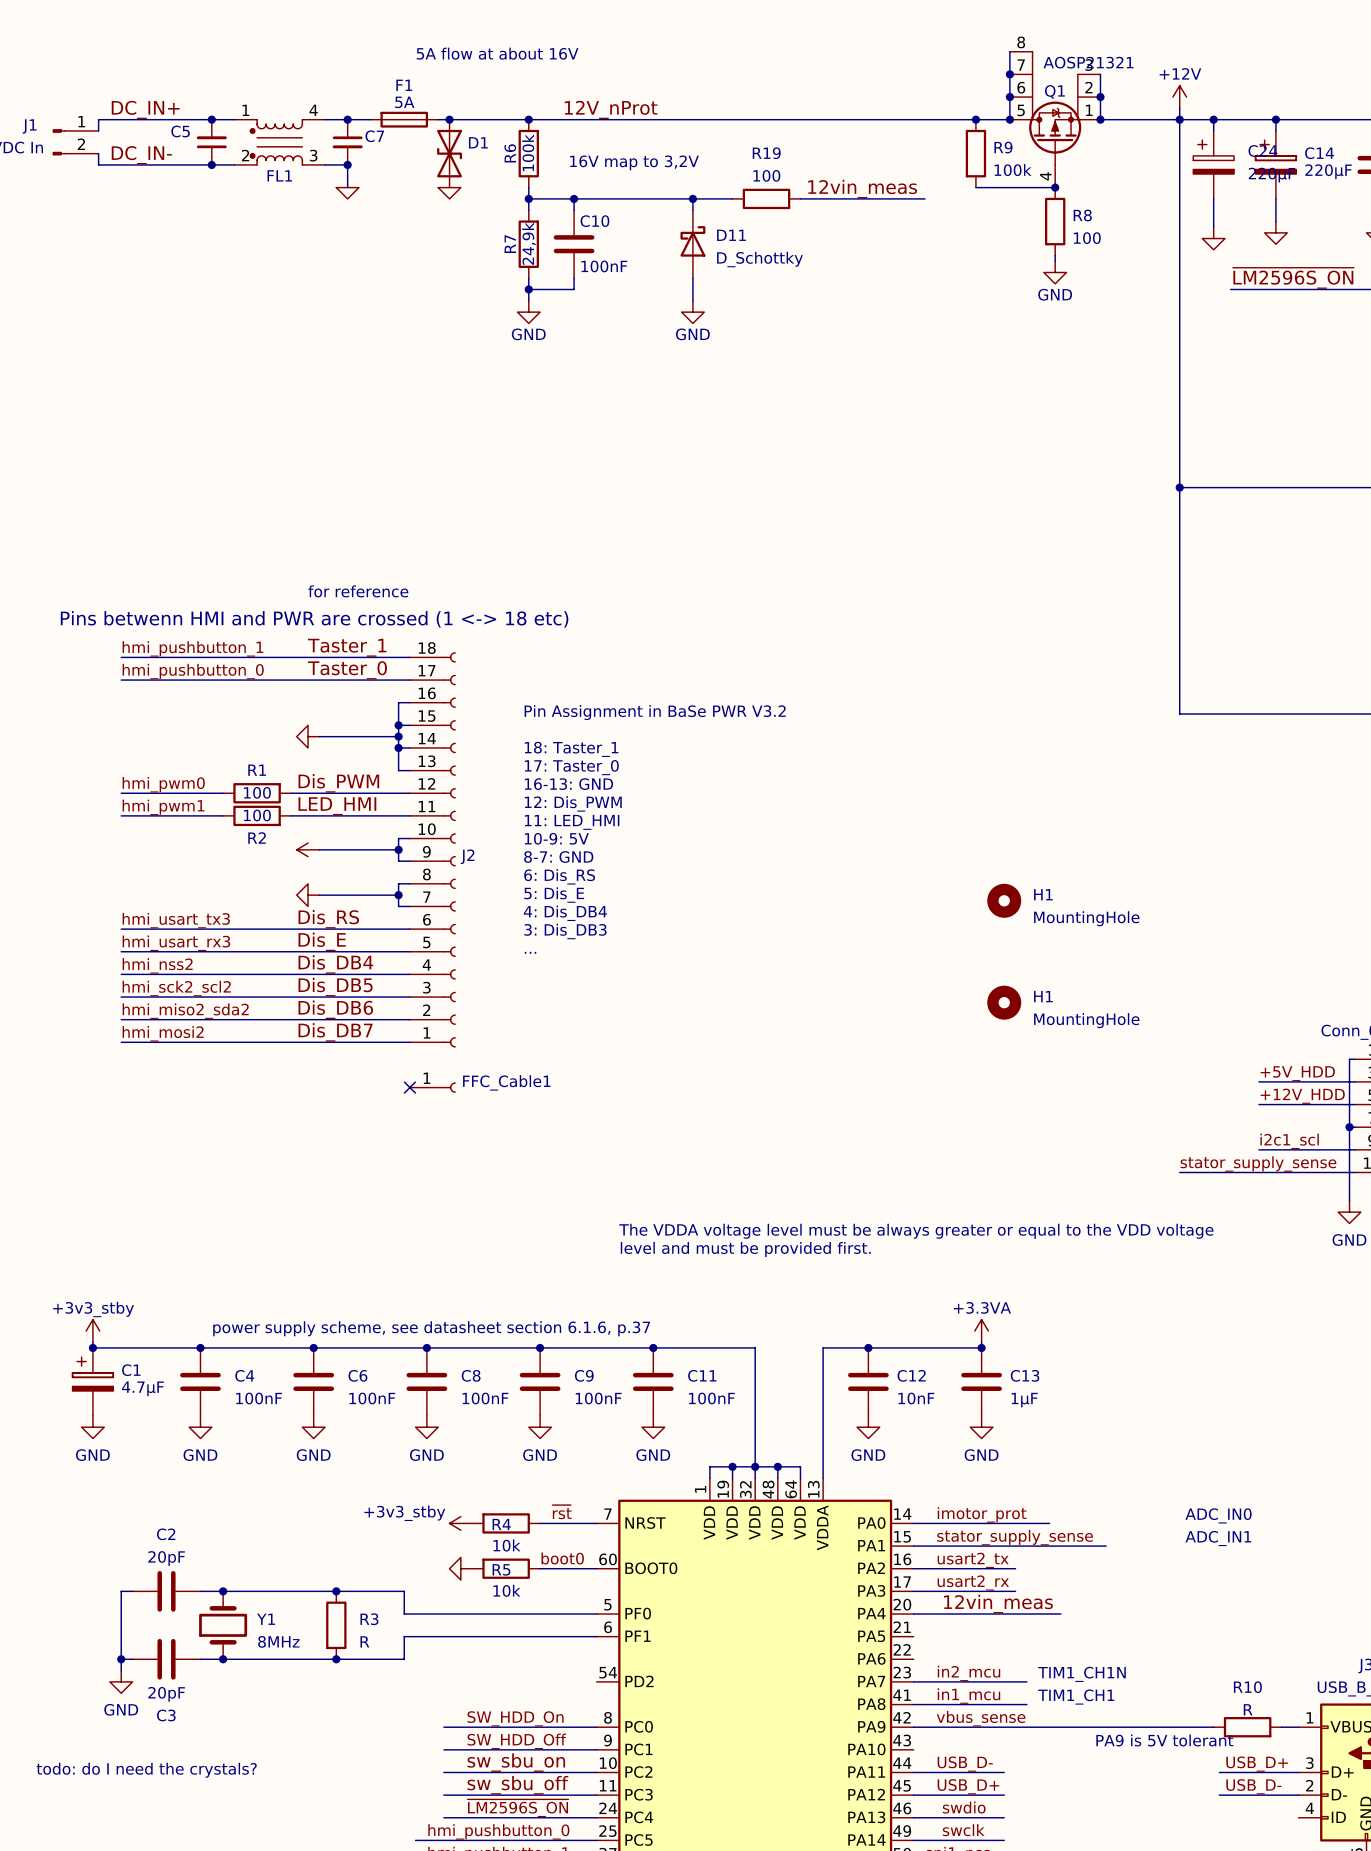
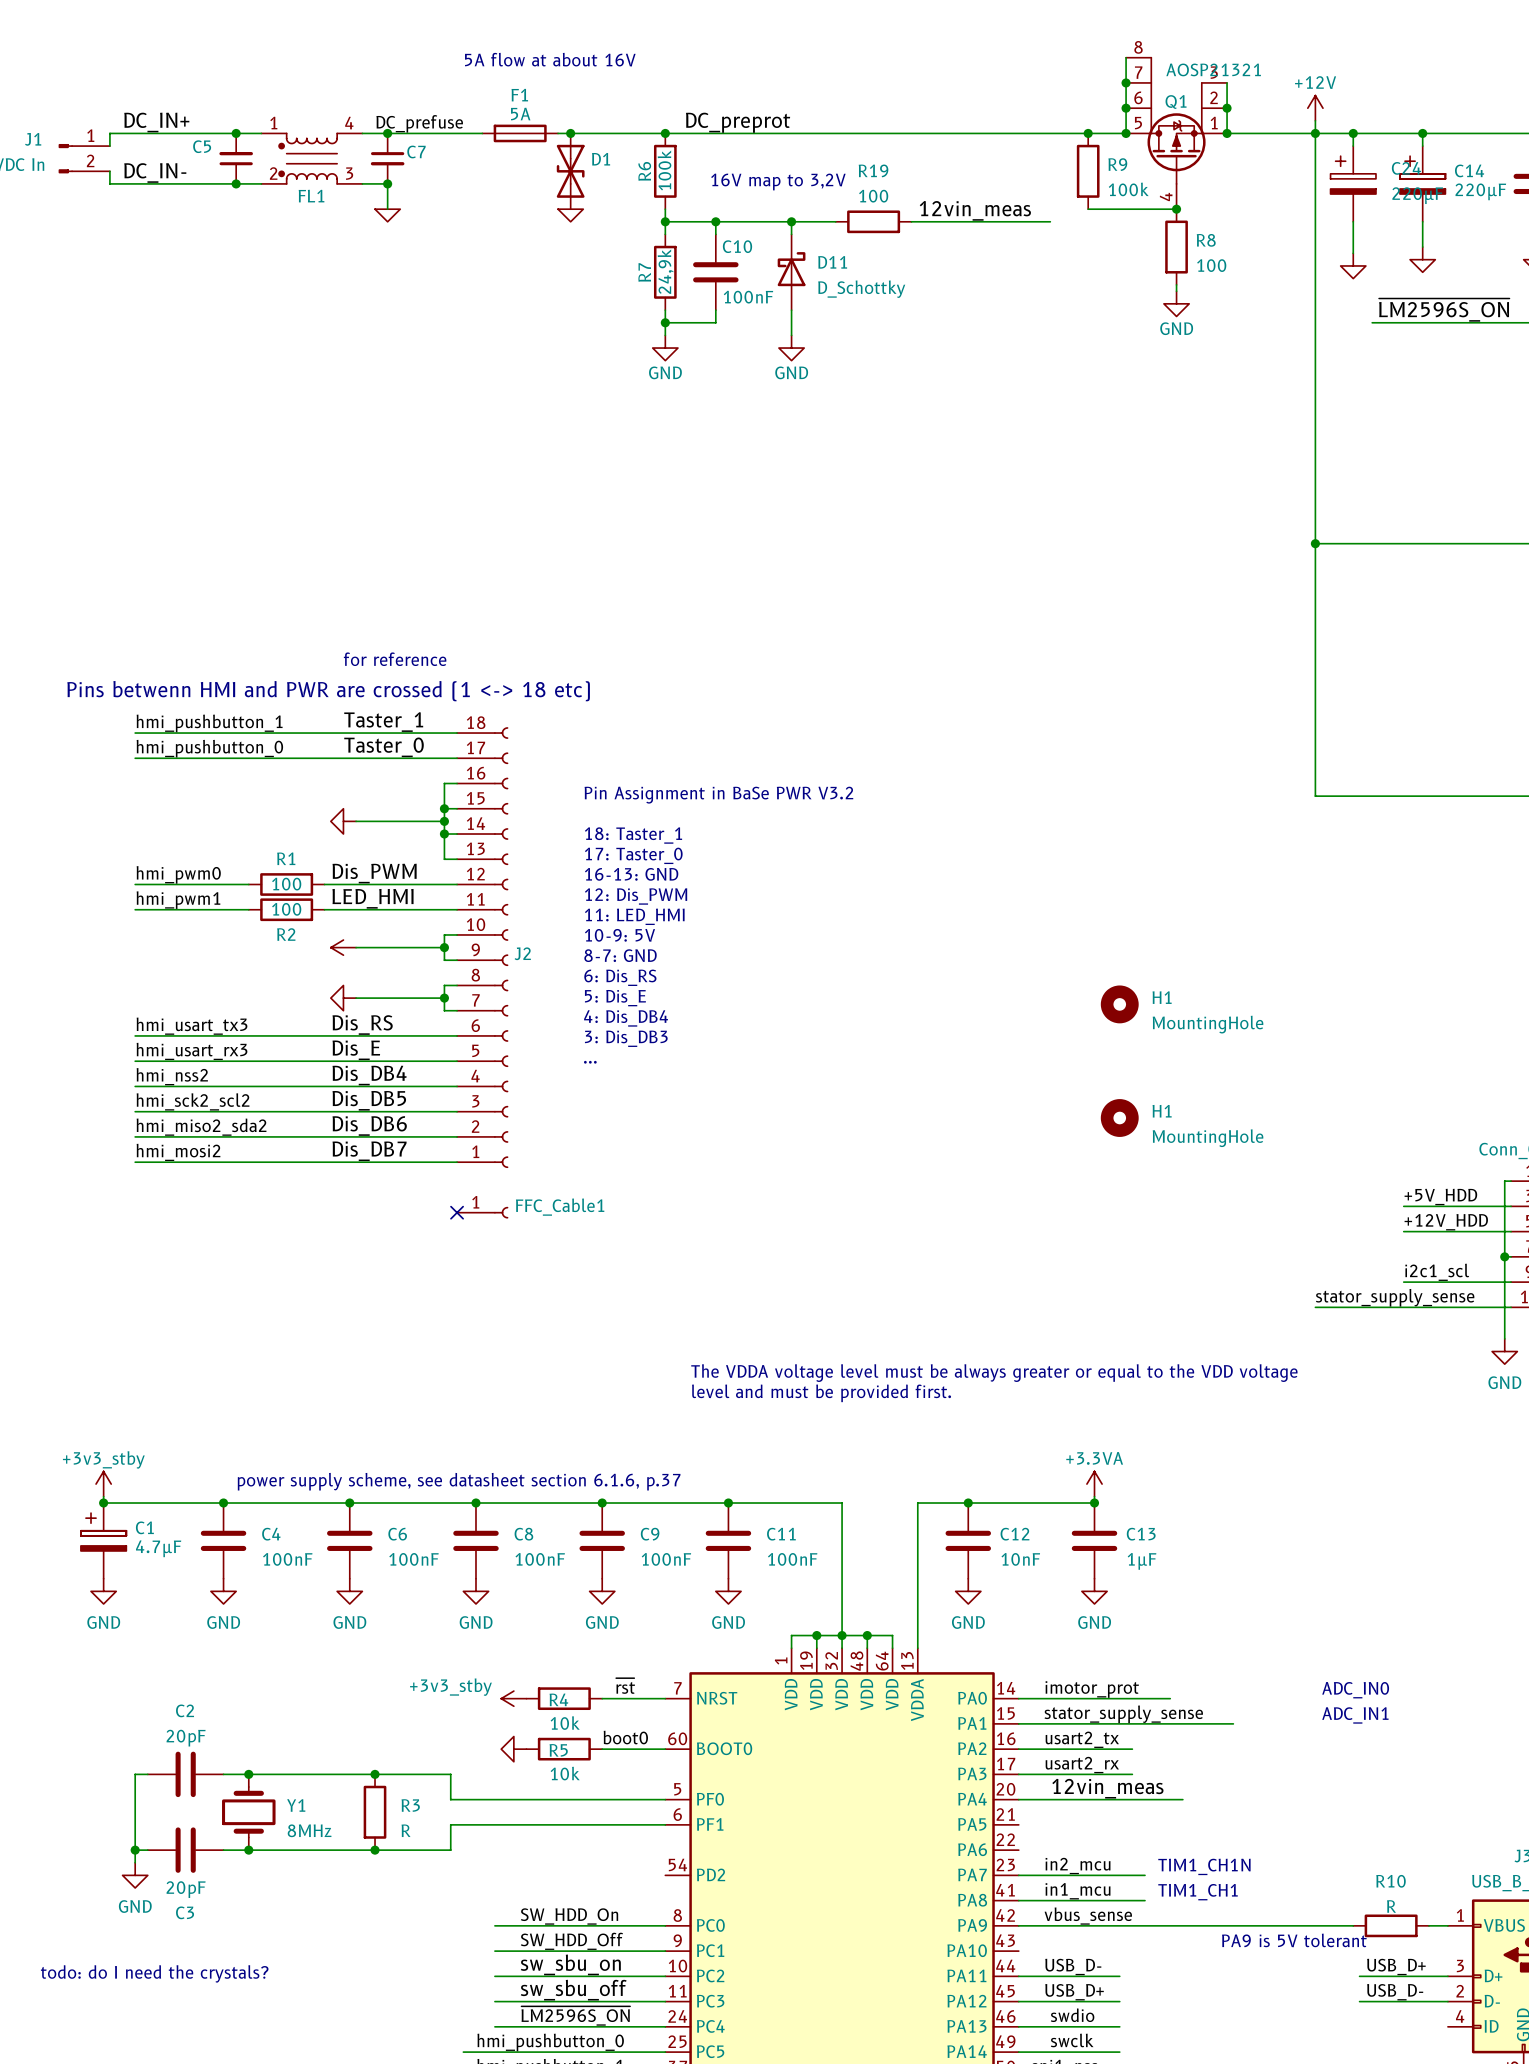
label: 12V_nProt (611, 109) -> none
label: none -> DC_preprot (738, 122)
label: none -> DC_prefuse (419, 123)
F1 position: (404, 119) -> (520, 133)
junction: (449, 119) -> none
junction position: (528, 119) -> (570, 133)
junction: none -> (665, 133)
D1 position: (449, 153) -> (570, 171)
R6 position: (528, 153) -> (665, 171)
text position: 16V map to 3,2V (634, 162) -> 16V map to 3,2V (778, 181)
wire: (528, 187) (528, 210) -> (665, 209) (665, 234)
label position: 12vin_meas (862, 188) -> 12vin_meas (975, 210)
power symbol position: (449, 193) -> (570, 215)
wire: (528, 198) (596, 198) -> none
junction: (528, 198) -> none
wire: (574, 198) (574, 210) -> (715, 221) (715, 234)
junction position: (574, 198) -> (665, 221)
junction: none -> (715, 221)
wire: (692, 198) (692, 210) -> (791, 221) (791, 234)
junction position: (692, 198) -> (791, 221)
R19 position: (766, 198) -> (873, 221)
wire: none -> (1031, 221) (1050, 221)
R7 position: (528, 244) -> (665, 272)
C10 position: (574, 244) -> (715, 272)
D11 position: (692, 244) -> (791, 272)
wire: (528, 278) (528, 300) -> (665, 310) (665, 335)
wire: (574, 278) (574, 289) (528, 289) -> (715, 310) (715, 322) (665, 322)
wire: (692, 278) (692, 300) -> (791, 310) (791, 335)
junction: (528, 289) -> none
junction: none -> (665, 322)
power symbol: GND (528, 312) -> none
power symbol: none -> GND (665, 348)
power symbol position: GND (692, 312) -> GND (791, 348)

